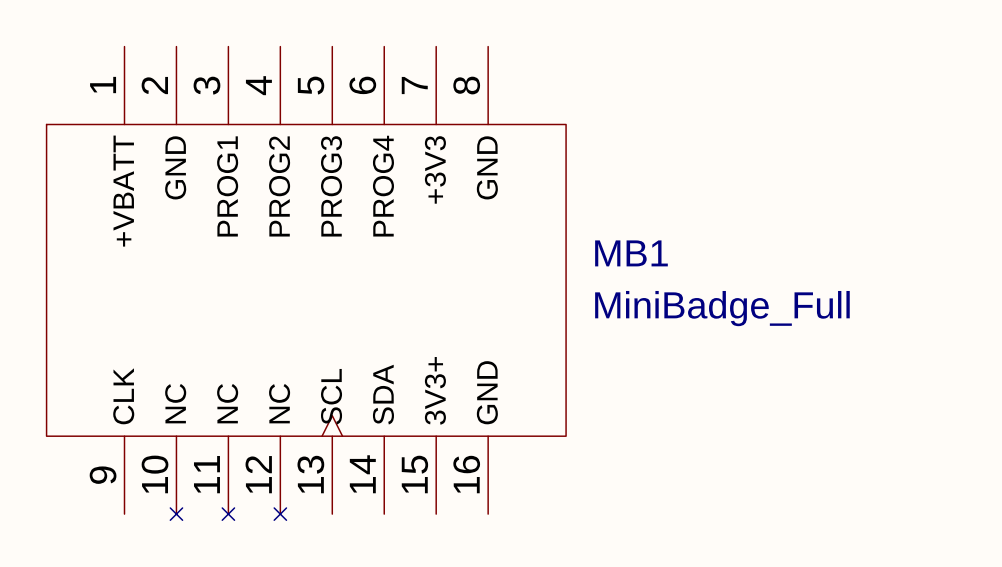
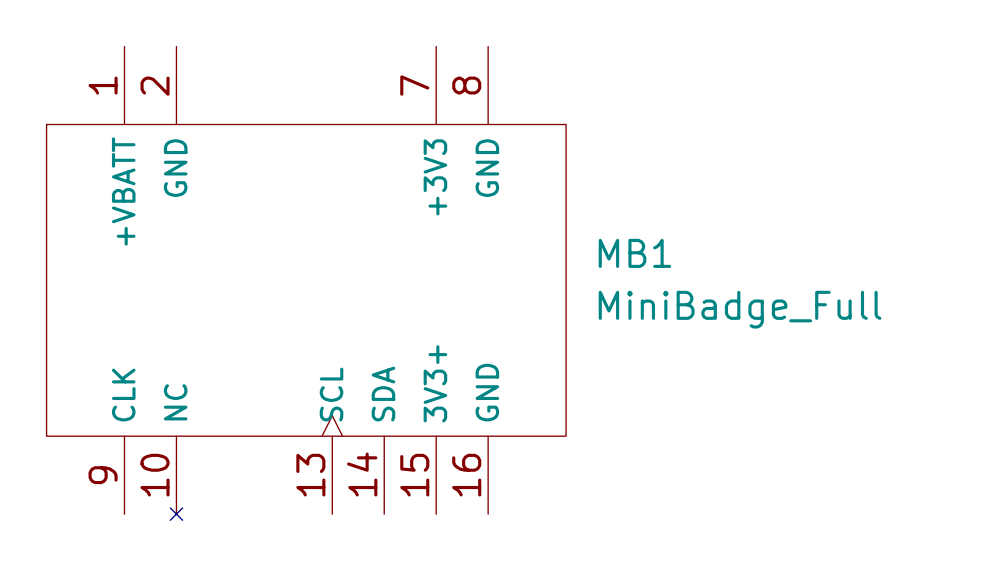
MB1 symbol: [46, 46, 567, 521] -> [46, 46, 567, 521]

